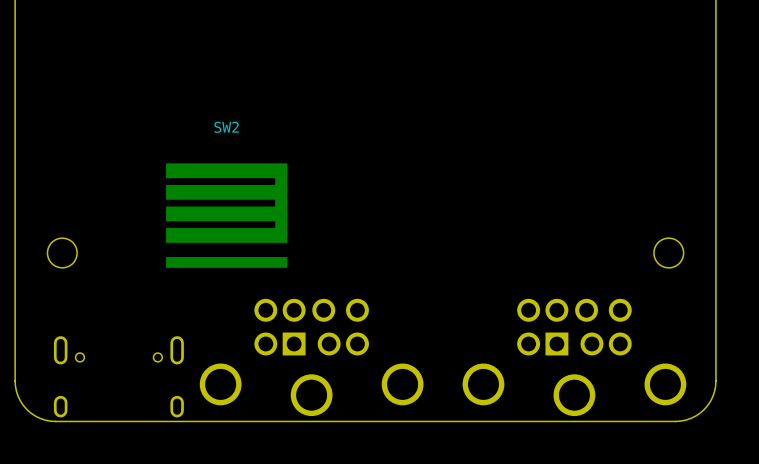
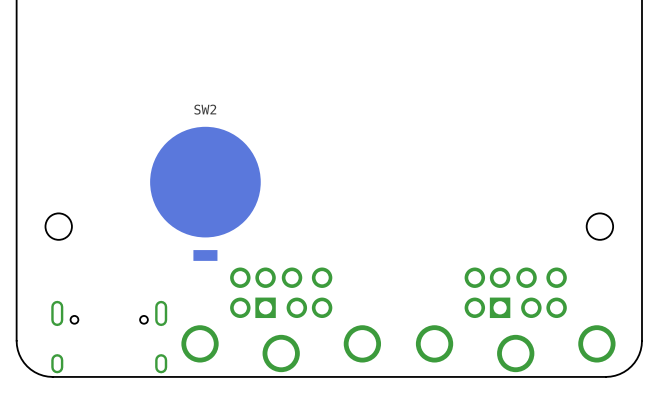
SW2 footprint: [166, 163, 288, 268] -> [150, 126, 261, 261]

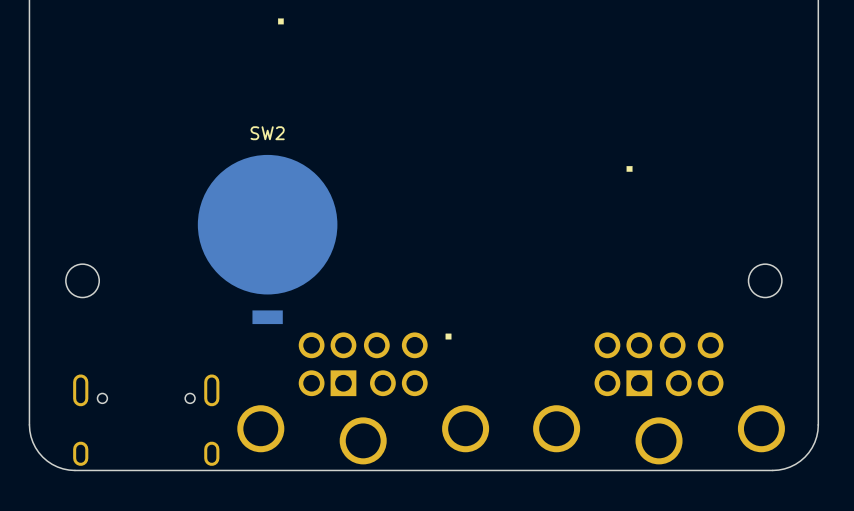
drawing: none -> [277, 18, 284, 25]
drawing: none -> [626, 166, 633, 172]
drawing: none -> [445, 333, 452, 340]

